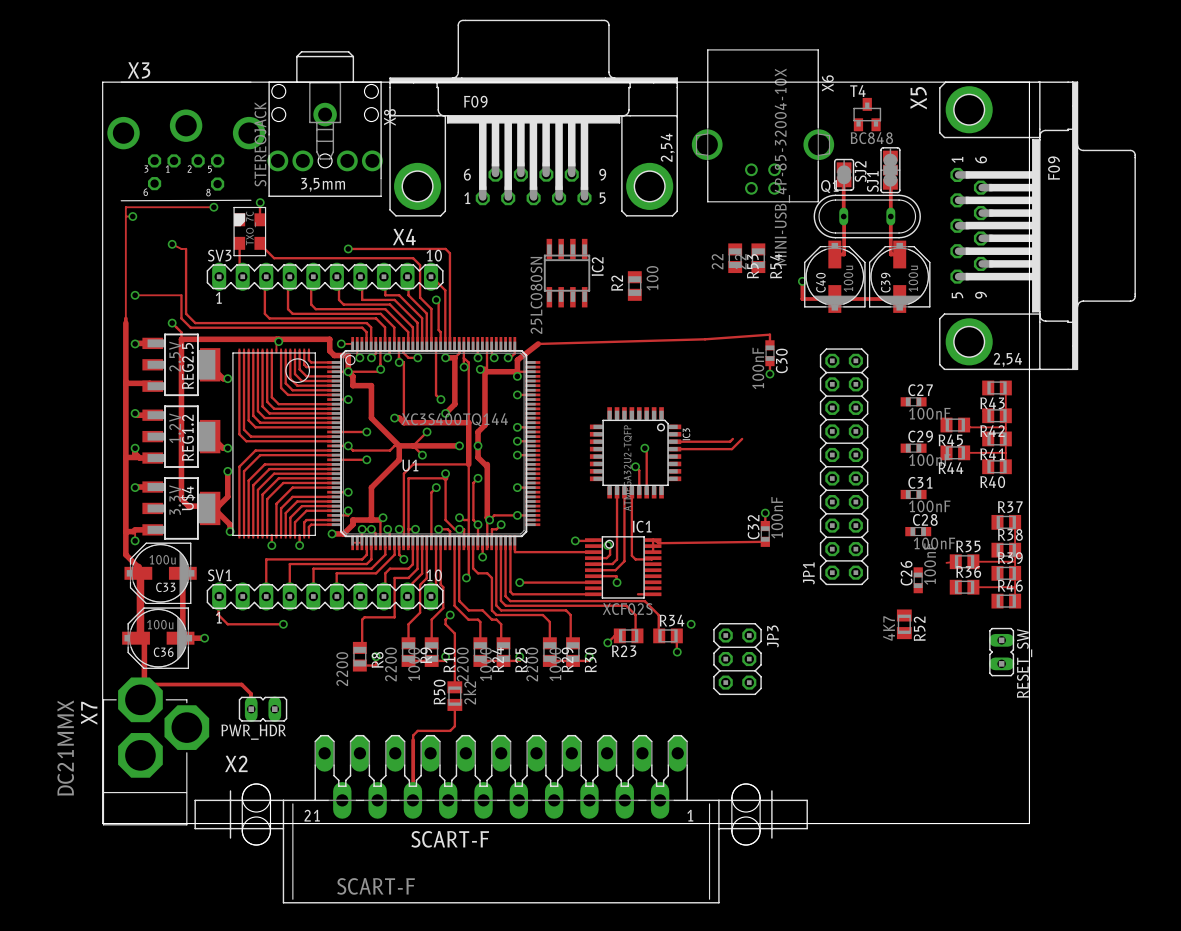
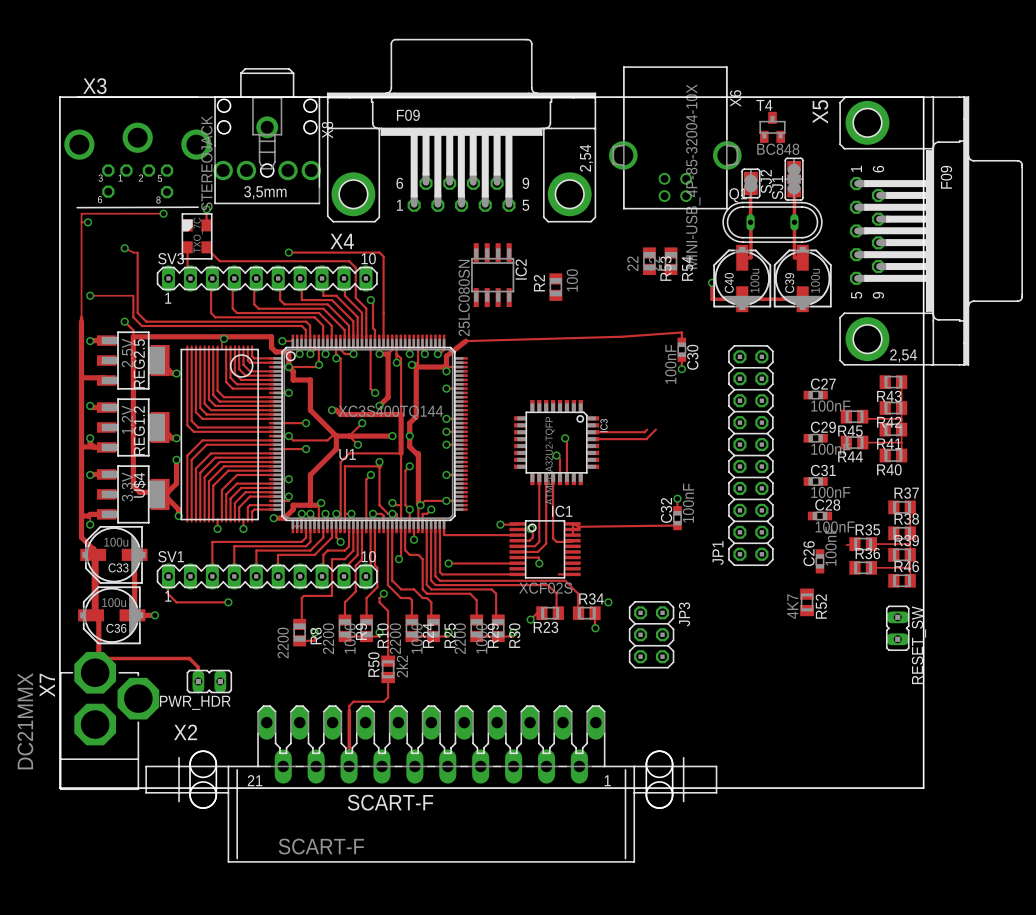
track: (431, 276) (445, 290) (445, 344) -> none

